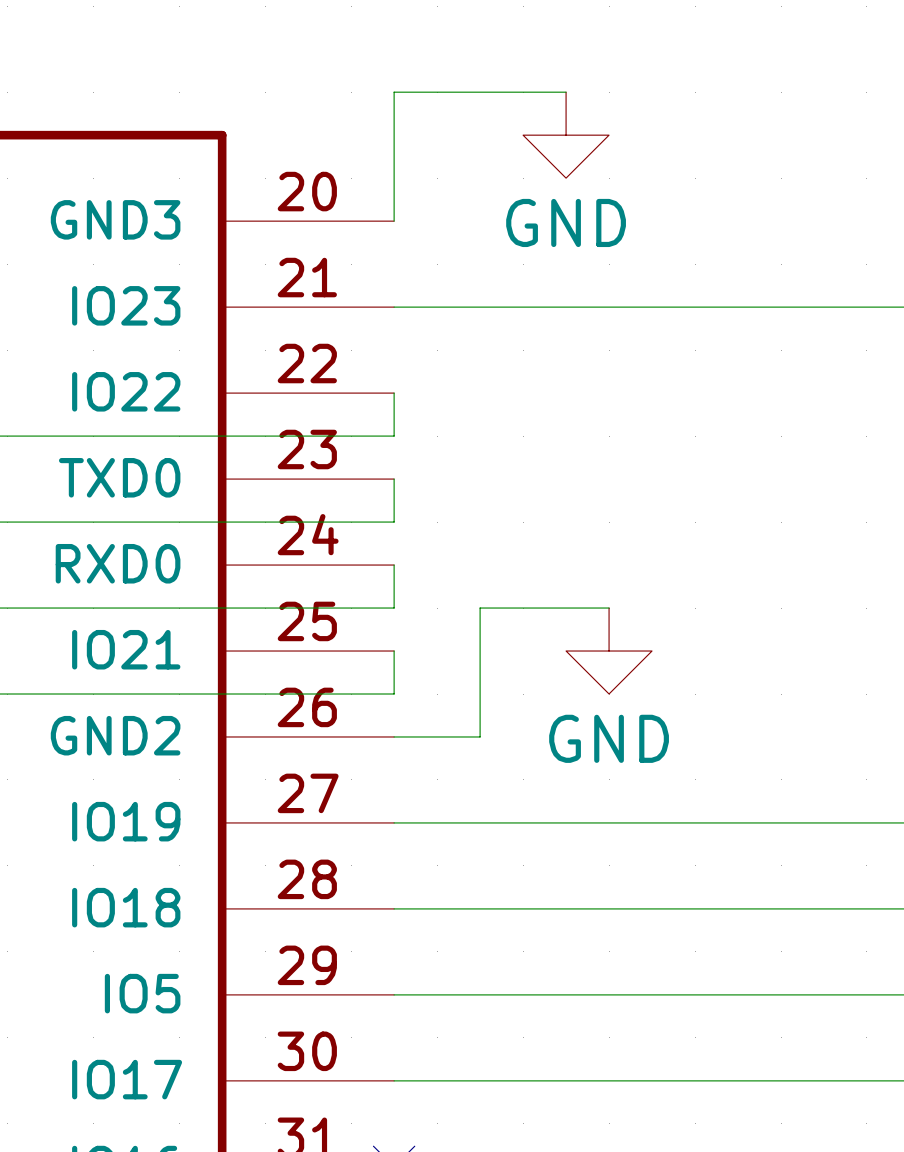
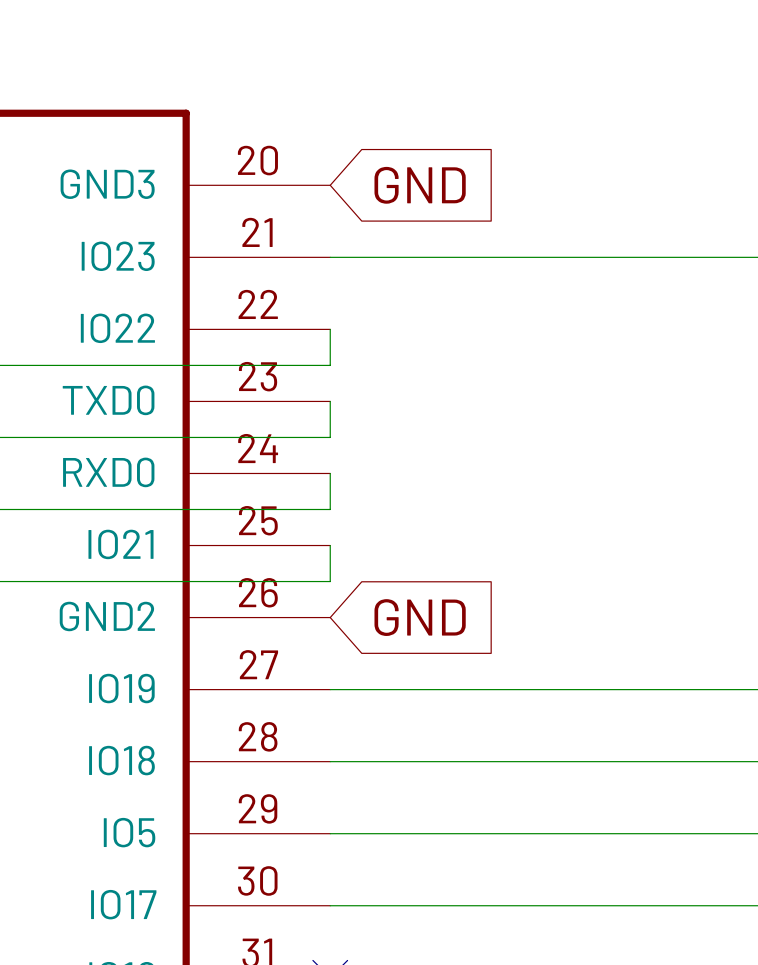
wire: (566, 92) (394, 92) (394, 221) -> none
power symbol: GND (566, 135) -> none
global label: none -> GND (420, 185)
wire: (609, 608) (480, 608) (480, 736) (394, 736) -> none
power symbol: GND (609, 651) -> none
global label: none -> GND (420, 617)

